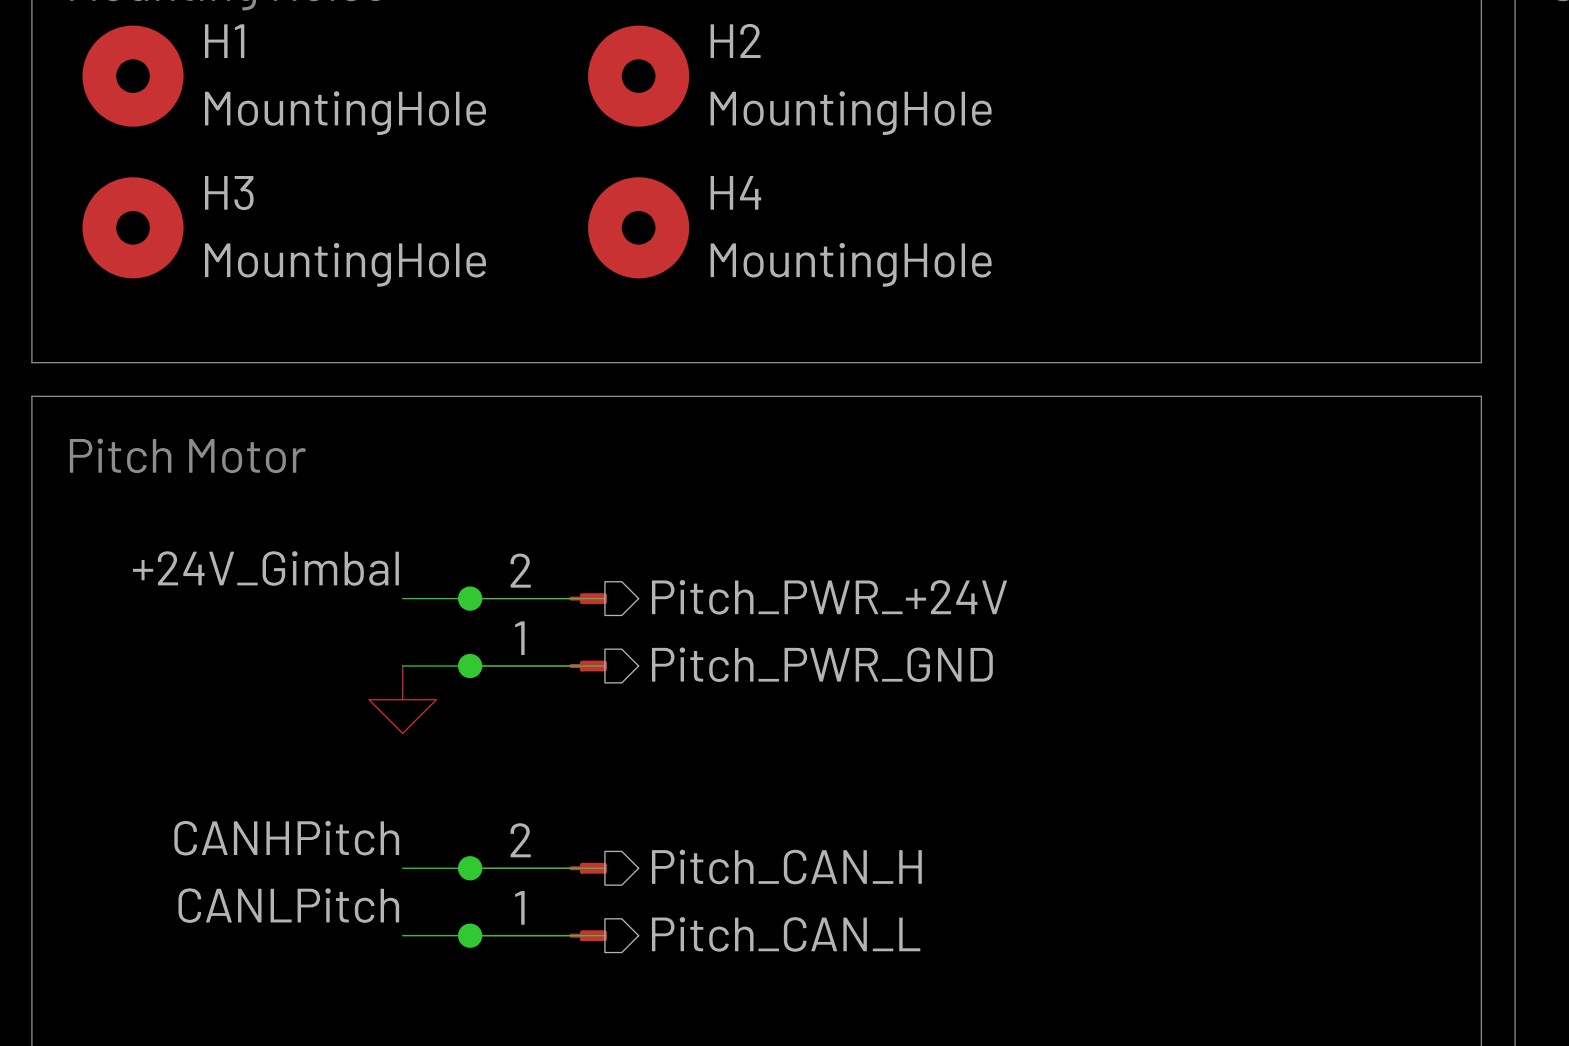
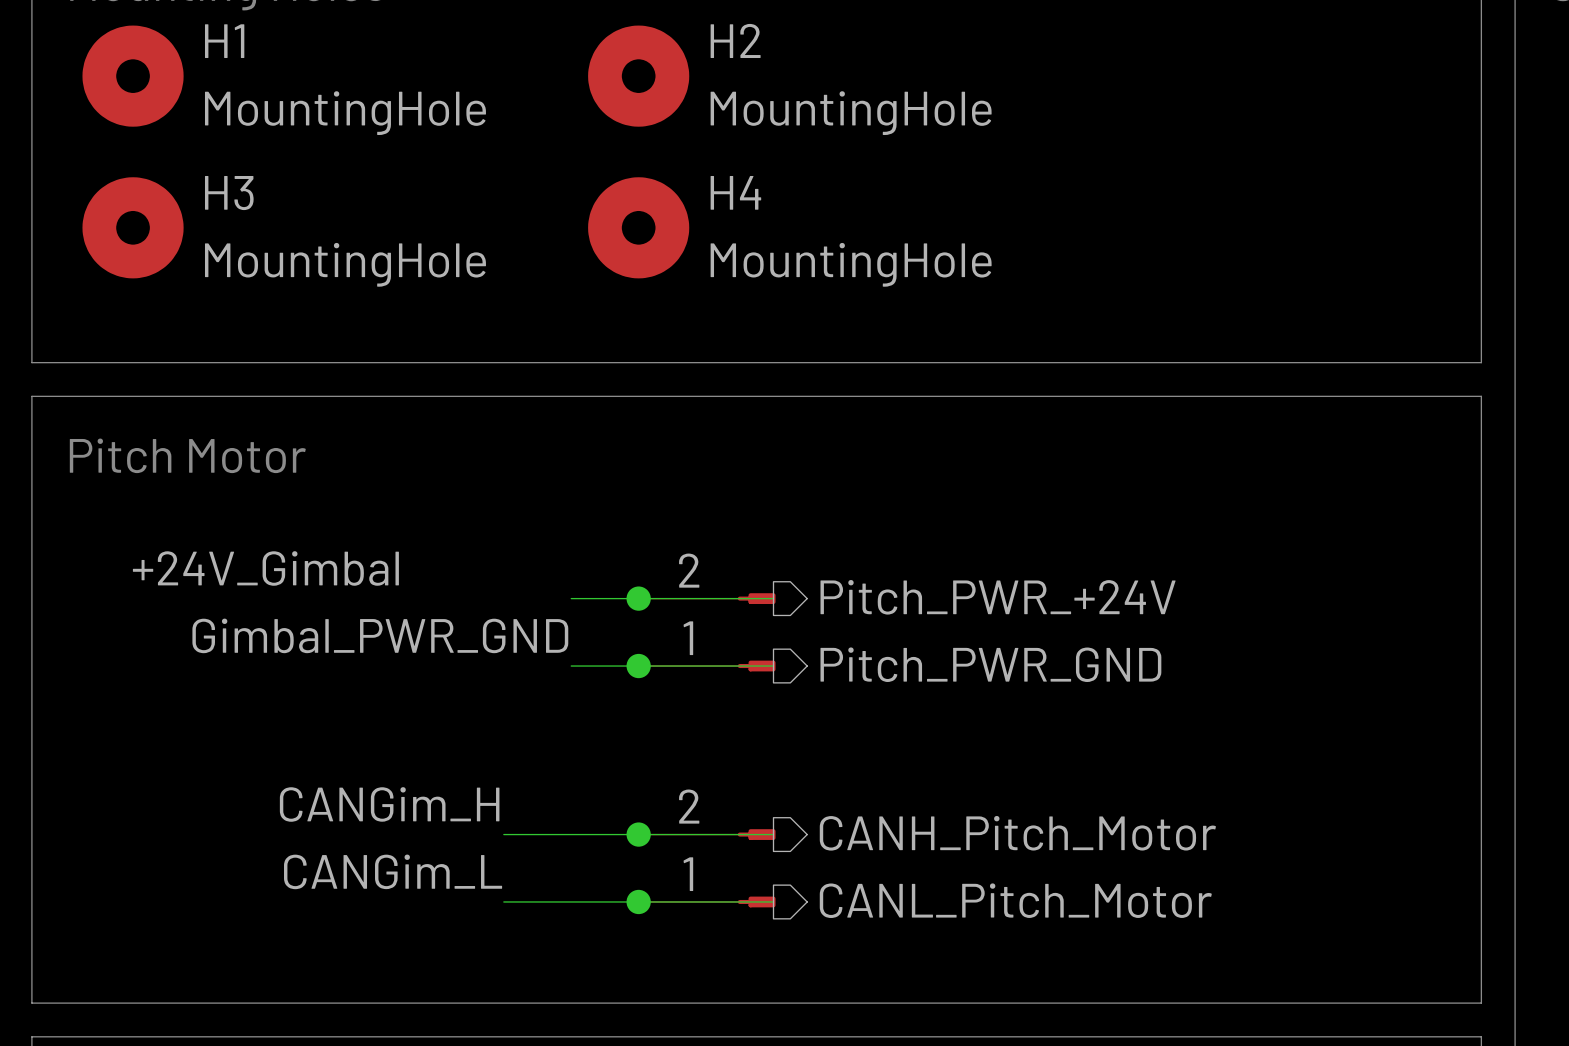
hierarchical label position: Pitch_PWR_+24V (829, 597) -> Pitch_PWR_+24V (998, 597)
wire: (402, 598) (571, 598) -> (604, 598) (773, 598)
junction: (470, 598) -> none
junction: none -> (638, 598)
part: (538, 632) -> none
part: none -> (707, 632)
label: none -> Gimbal_PWR_GND (380, 635)
hierarchical label position: Pitch_PWR_GND (822, 664) -> Pitch_PWR_GND (990, 664)
wire: (402, 666) (571, 666) -> (604, 666) (773, 666)
junction: (470, 666) -> none
junction: none -> (638, 666)
power symbol: (402, 699) -> none
label: none -> CANGim_H (389, 804)
hierarchical label: none -> CANH_Pitch_Motor (1017, 833)
wire: none -> (503, 834) (773, 834)
junction: none -> (638, 834)
label: CANHPitch (286, 838) -> none
hierarchical label: Pitch_CAN_H (786, 866) -> none
wire: (402, 868) (604, 868) -> none
junction: (470, 868) -> none
part: none -> (707, 868)
label: none -> CANGim_L (393, 871)
hierarchical label: none -> CANL_Pitch_Motor (1015, 900)
wire: none -> (503, 901) (773, 901)
part: (538, 901) -> none
junction: none -> (638, 901)
label: CANLPitch (288, 905) -> none
hierarchical label: Pitch_CAN_L (786, 934) -> none
wire: (402, 935) (604, 935) -> none
junction: (470, 935) -> none
line: (31, 1003) (31, 1036) -> (31, 1003) (1481, 1003)
line: (1481, 1003) (1481, 1036) -> (31, 1036) (1481, 1036)

